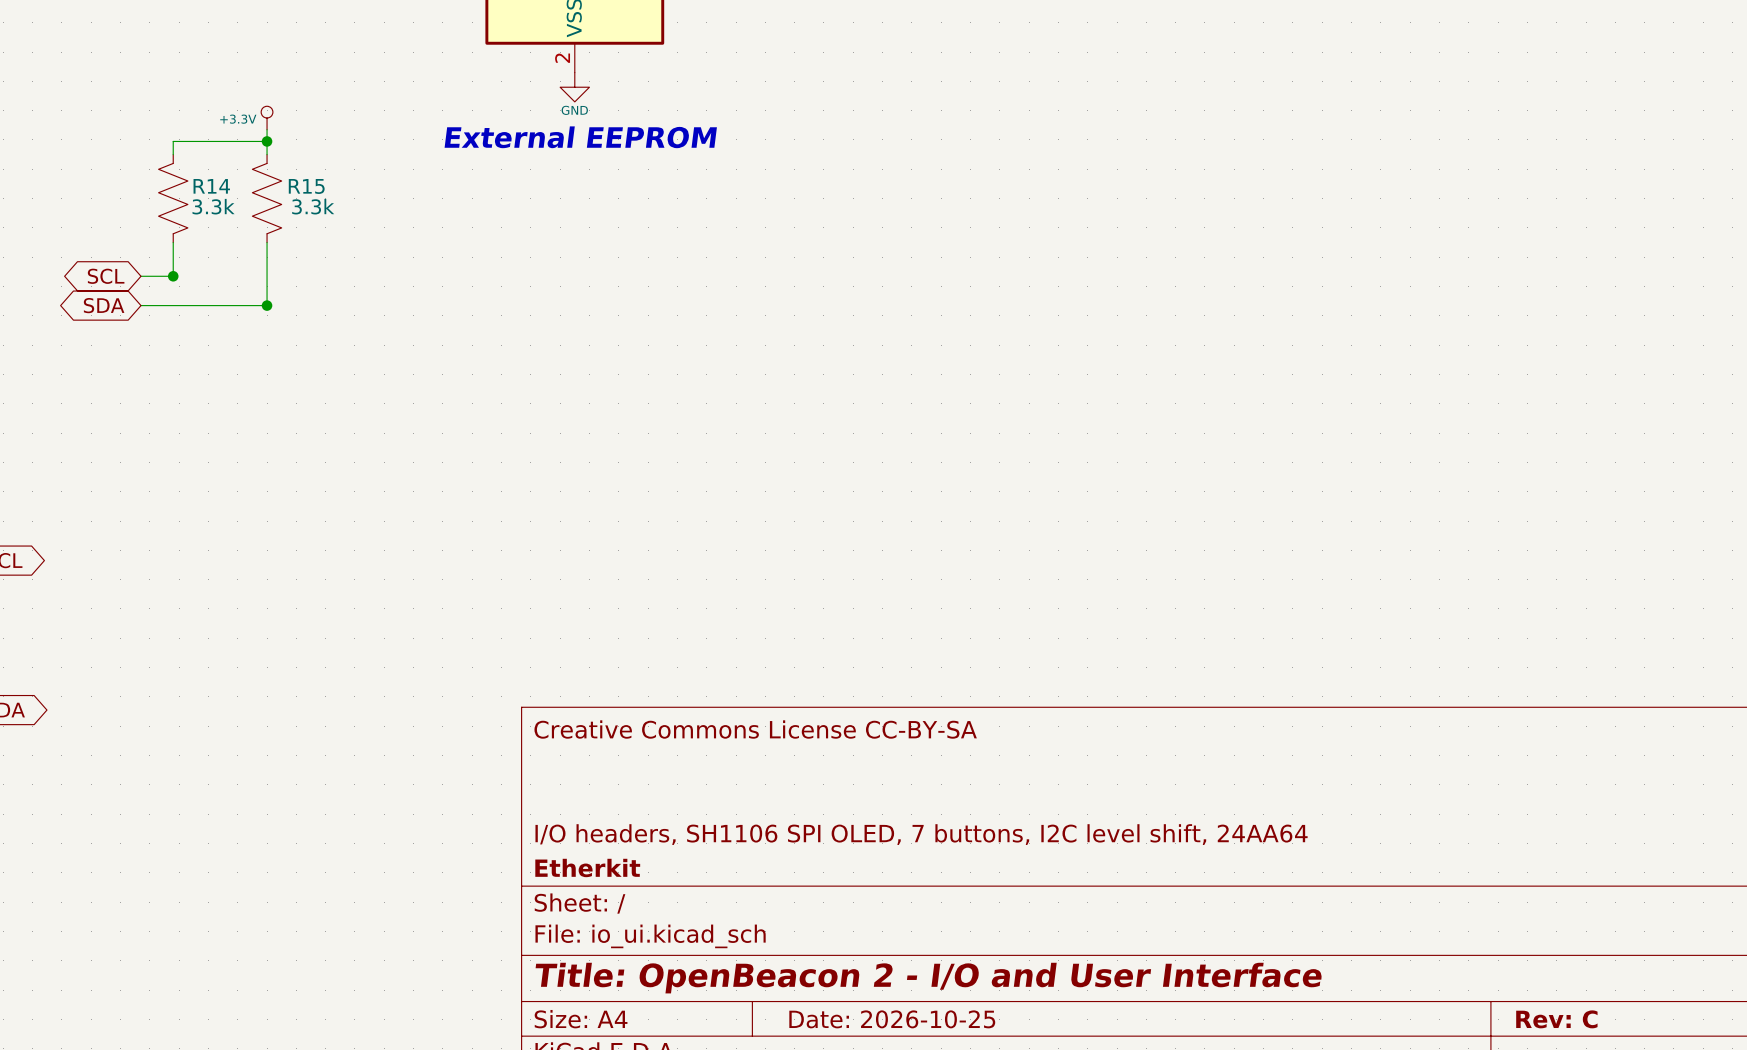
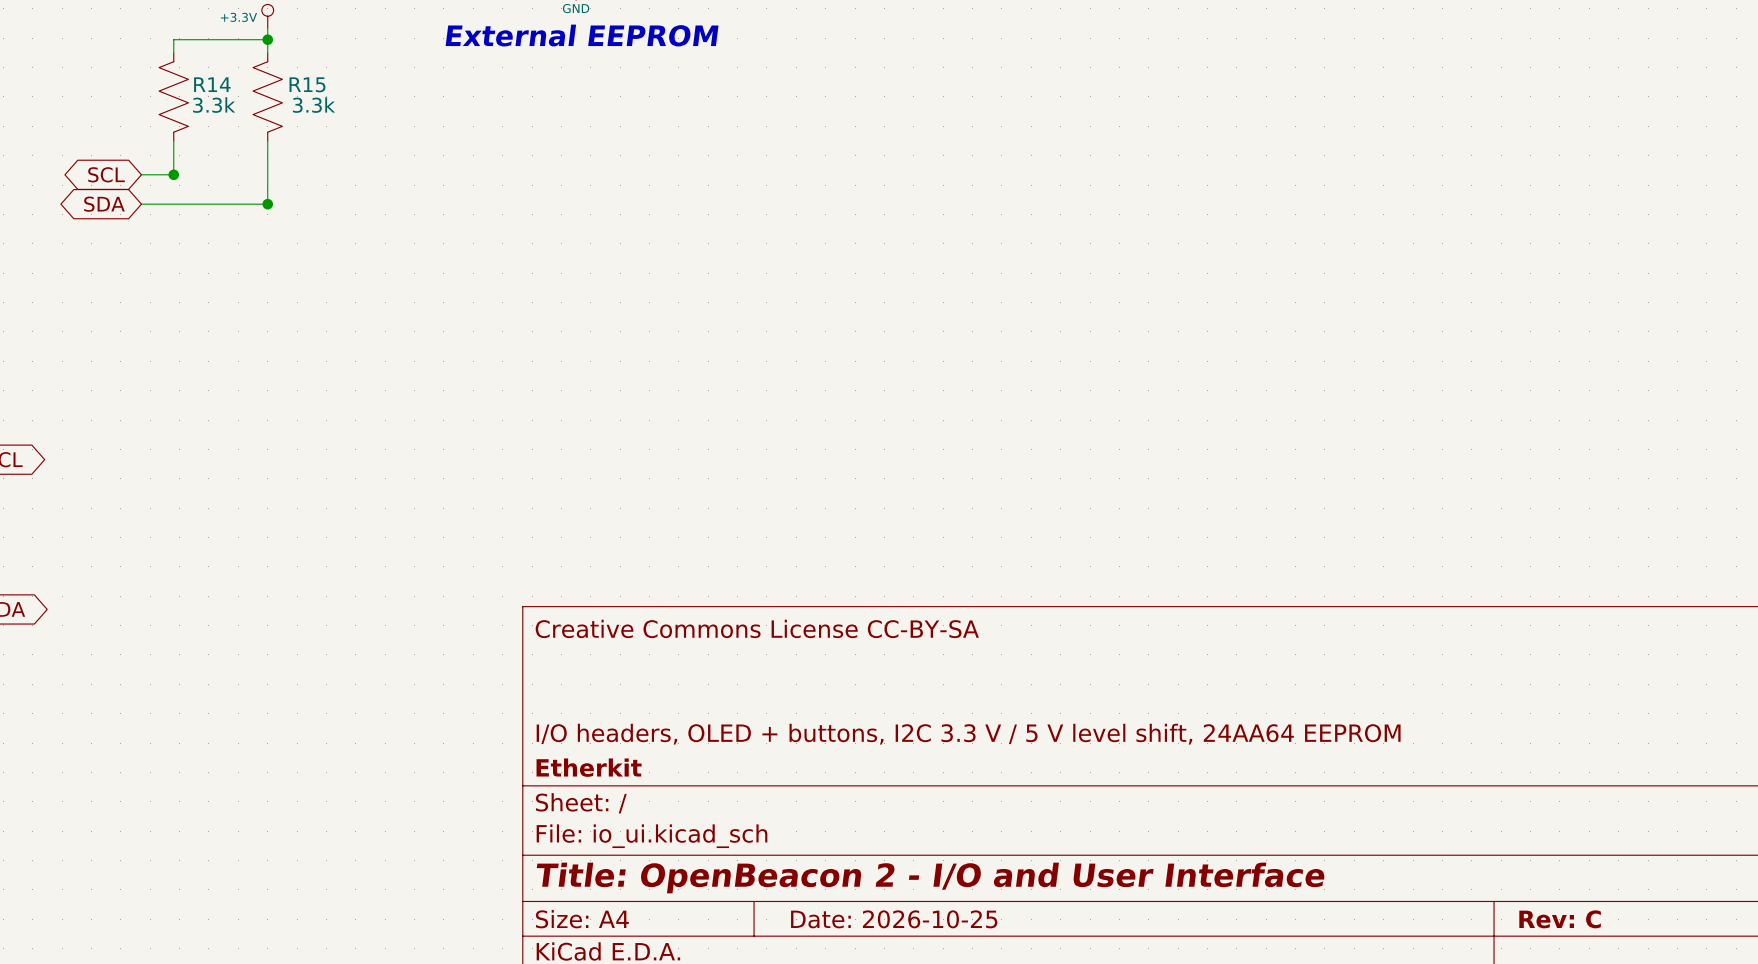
title block: I/O headers, SH1106 SPI OLED, 7 buttons, I2C level shift, 24AA64 (921, 834) -> I/O headers, OLED + buttons, I2C 3.3 V / 5 V level shift, 24AA64 EEPROM (968, 734)

